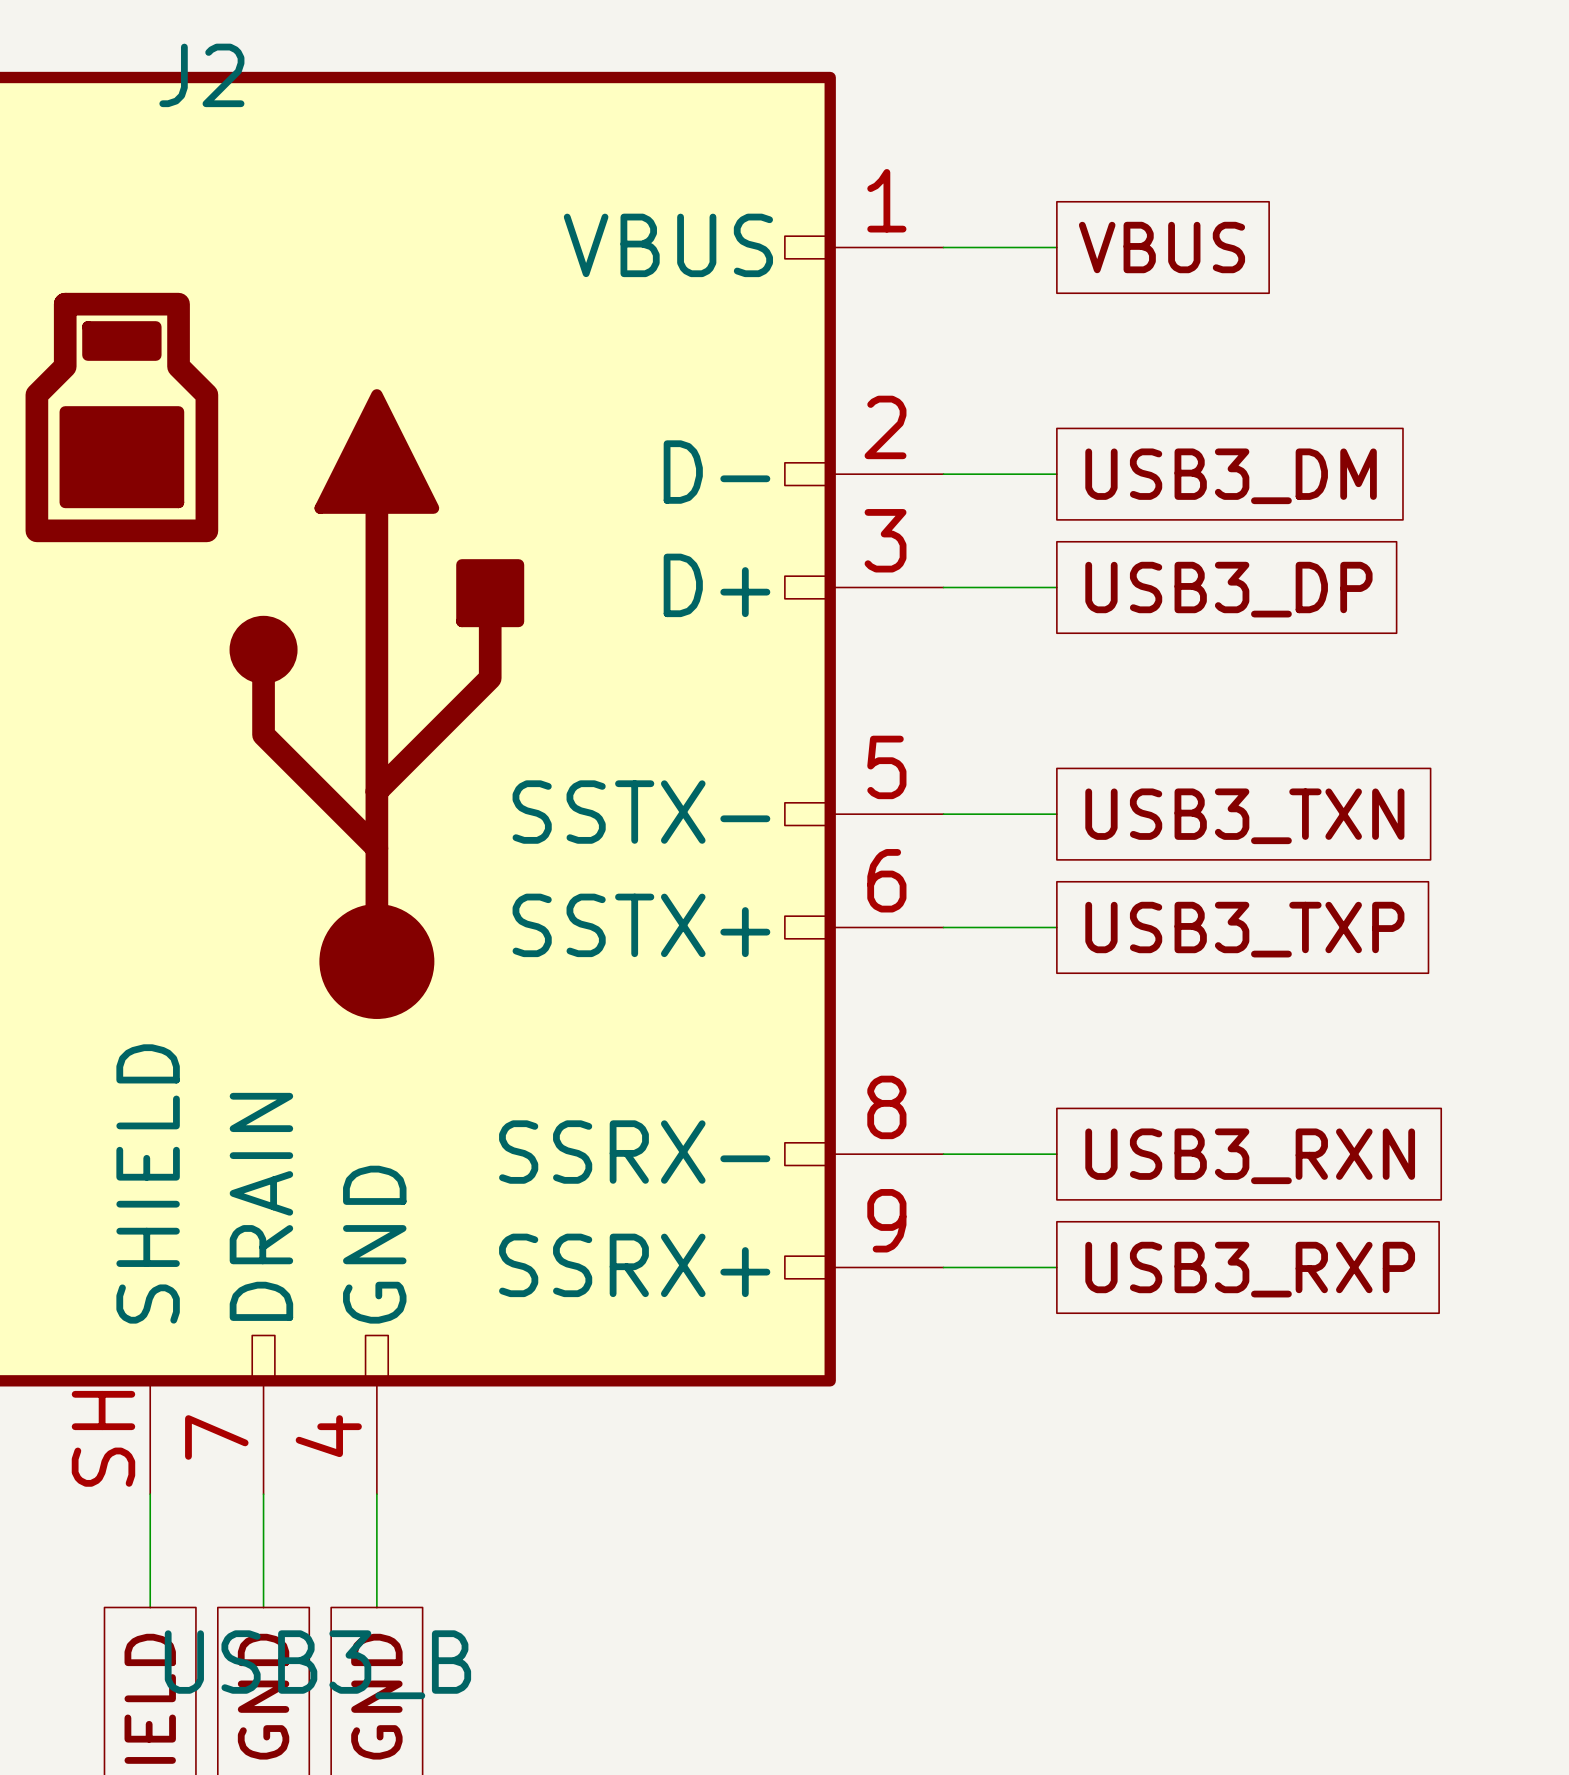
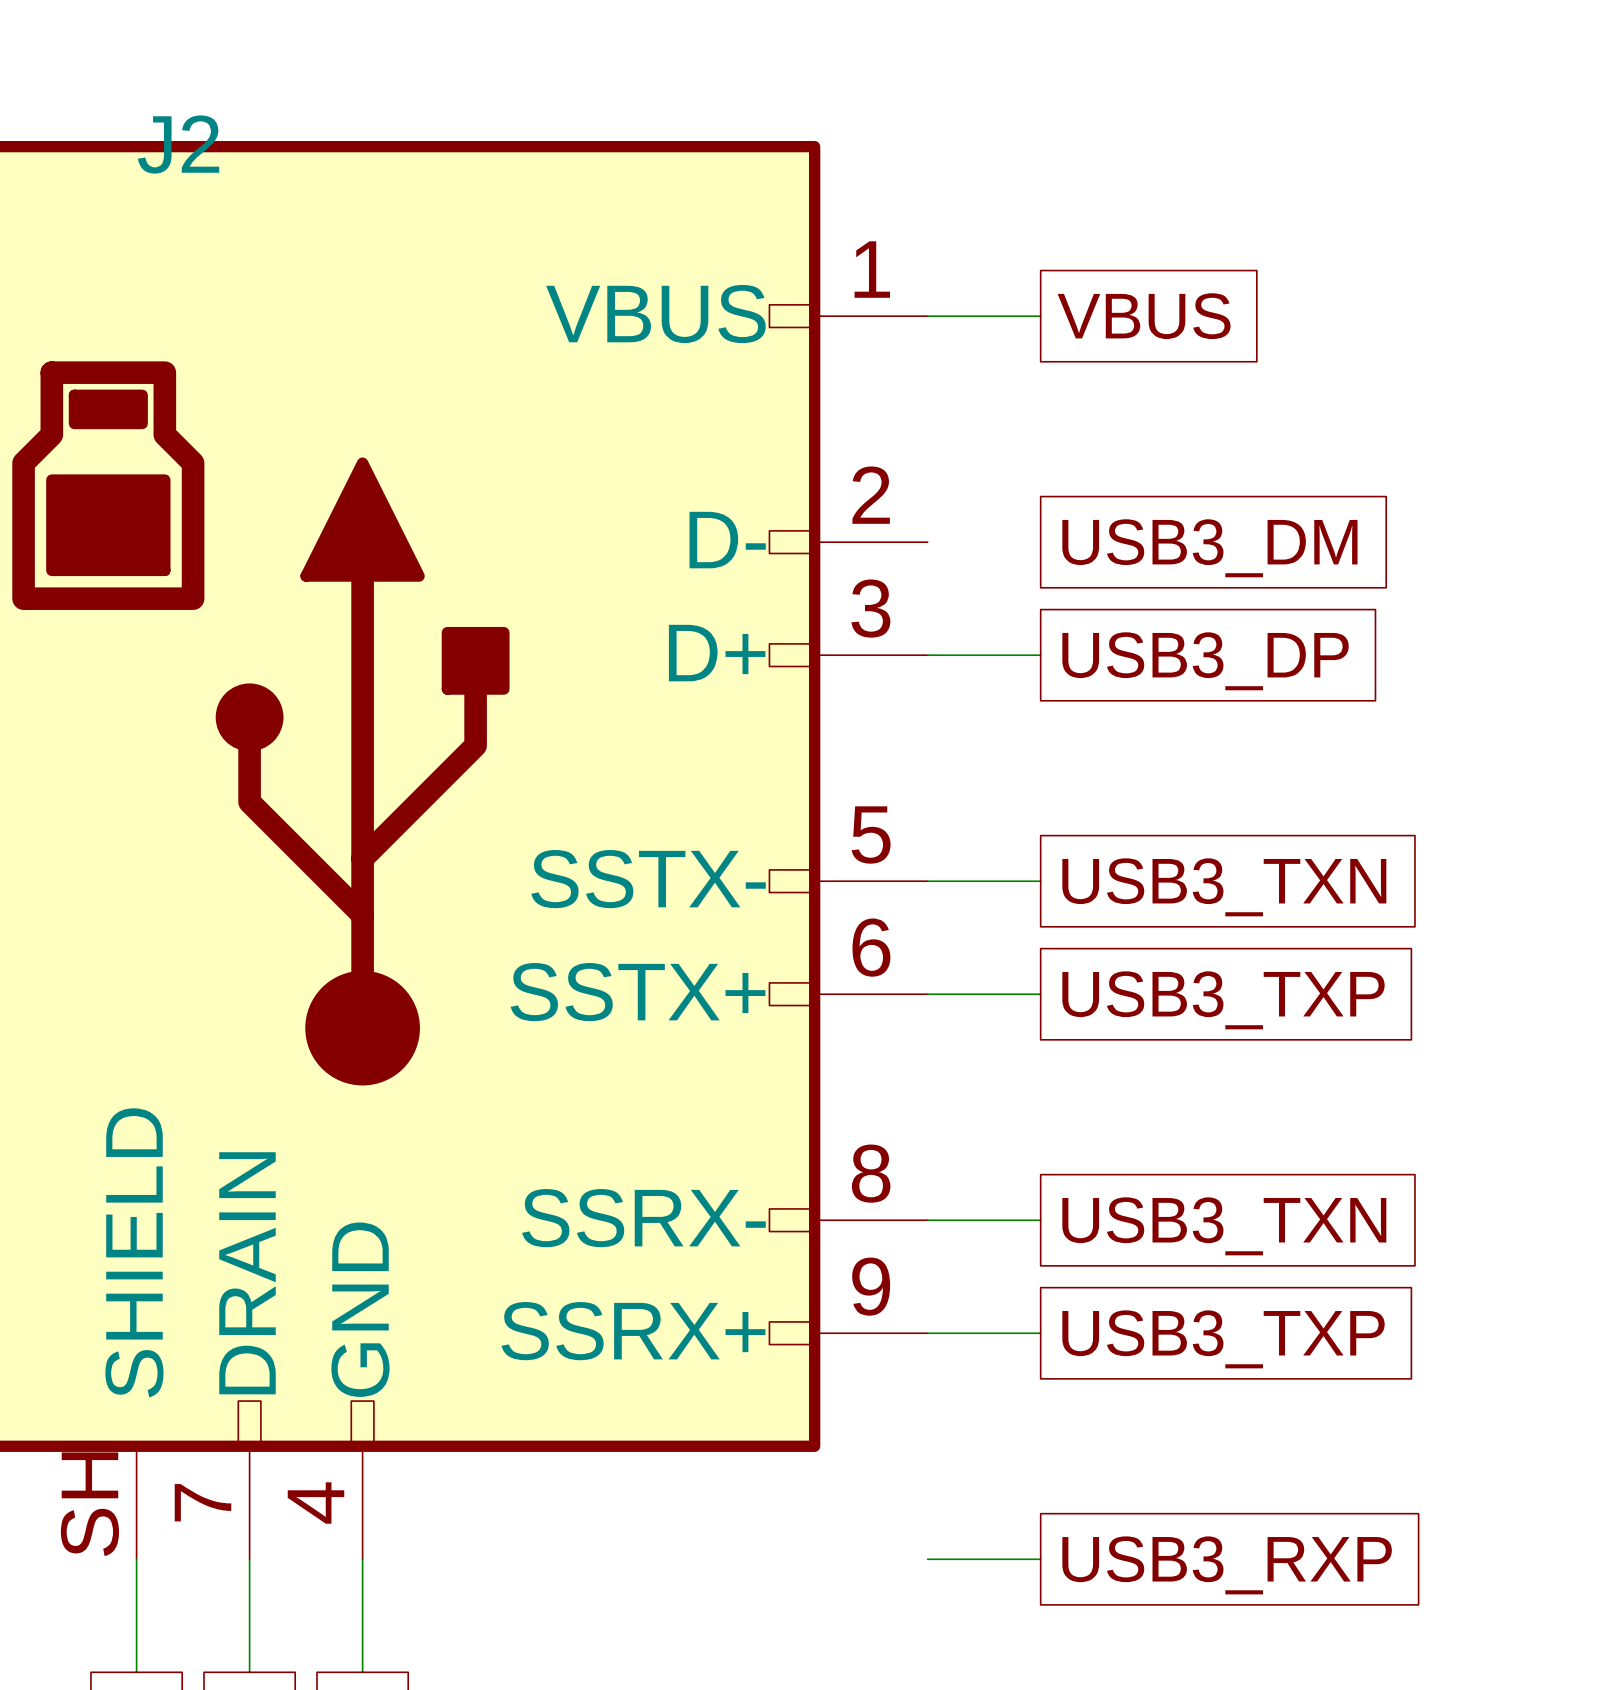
wire: (943, 474) (1056, 474) -> (927, 1559) (1040, 1559)
global label: USB3_RXN (1250, 1156) -> USB3_TXN (1224, 1226)
global label: USB3_RXP (1250, 1269) -> USB3_TXP (1223, 1339)
global label: none -> USB3_RXP (1227, 1565)

